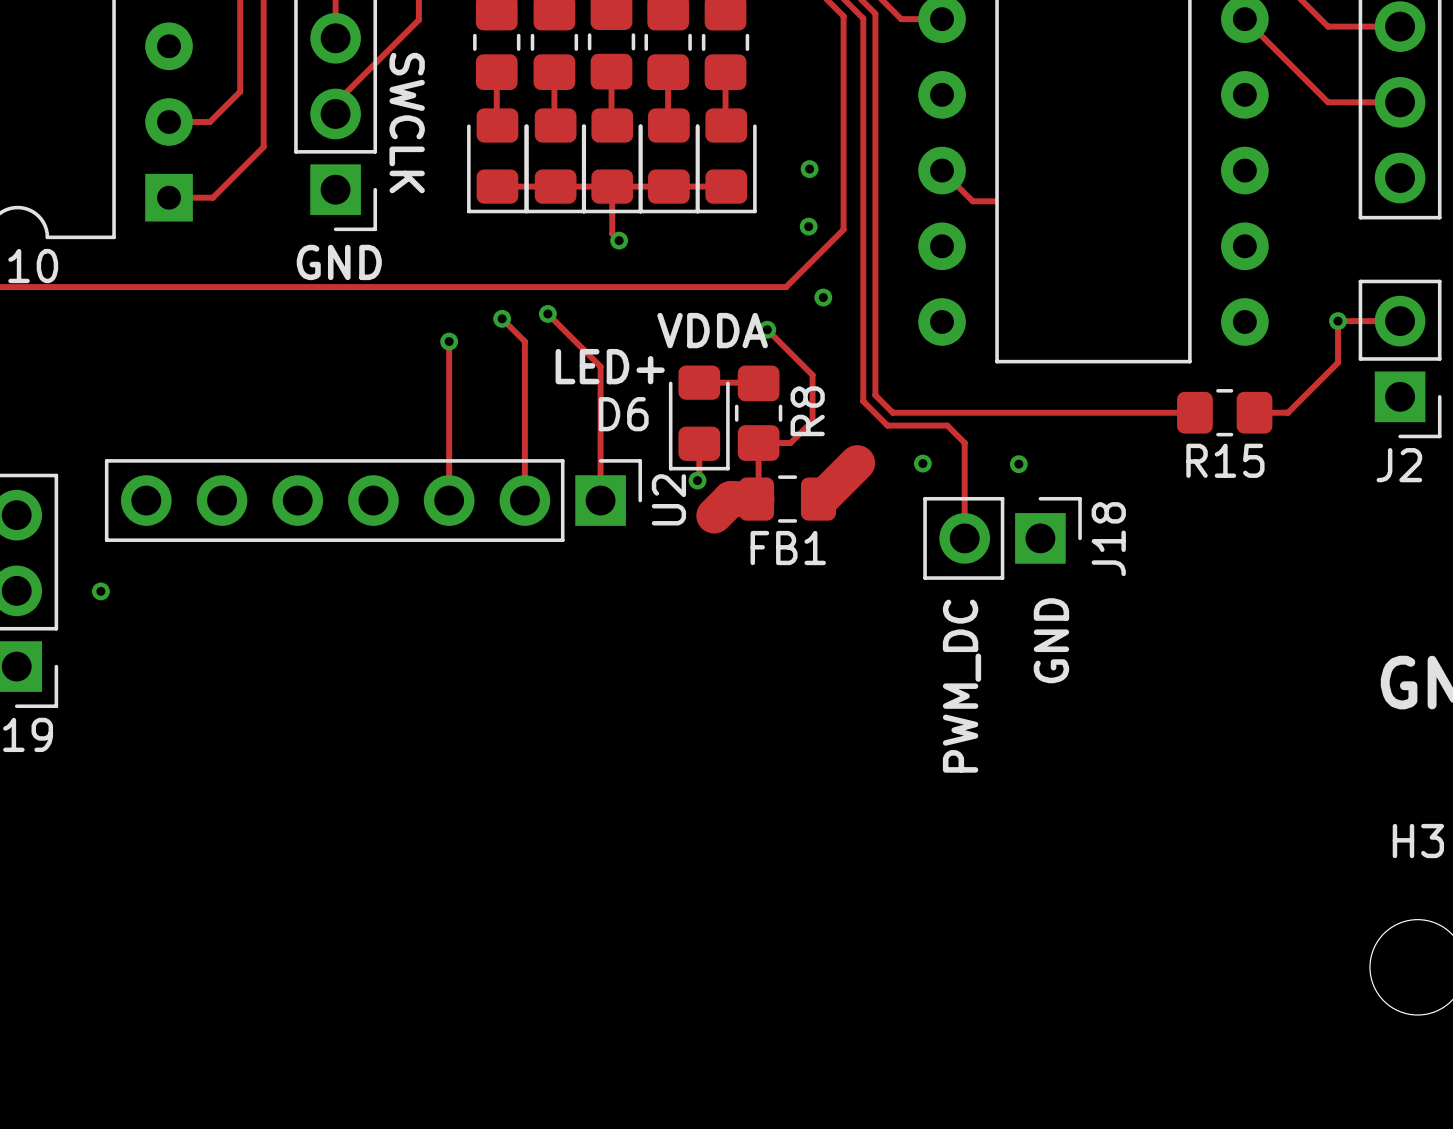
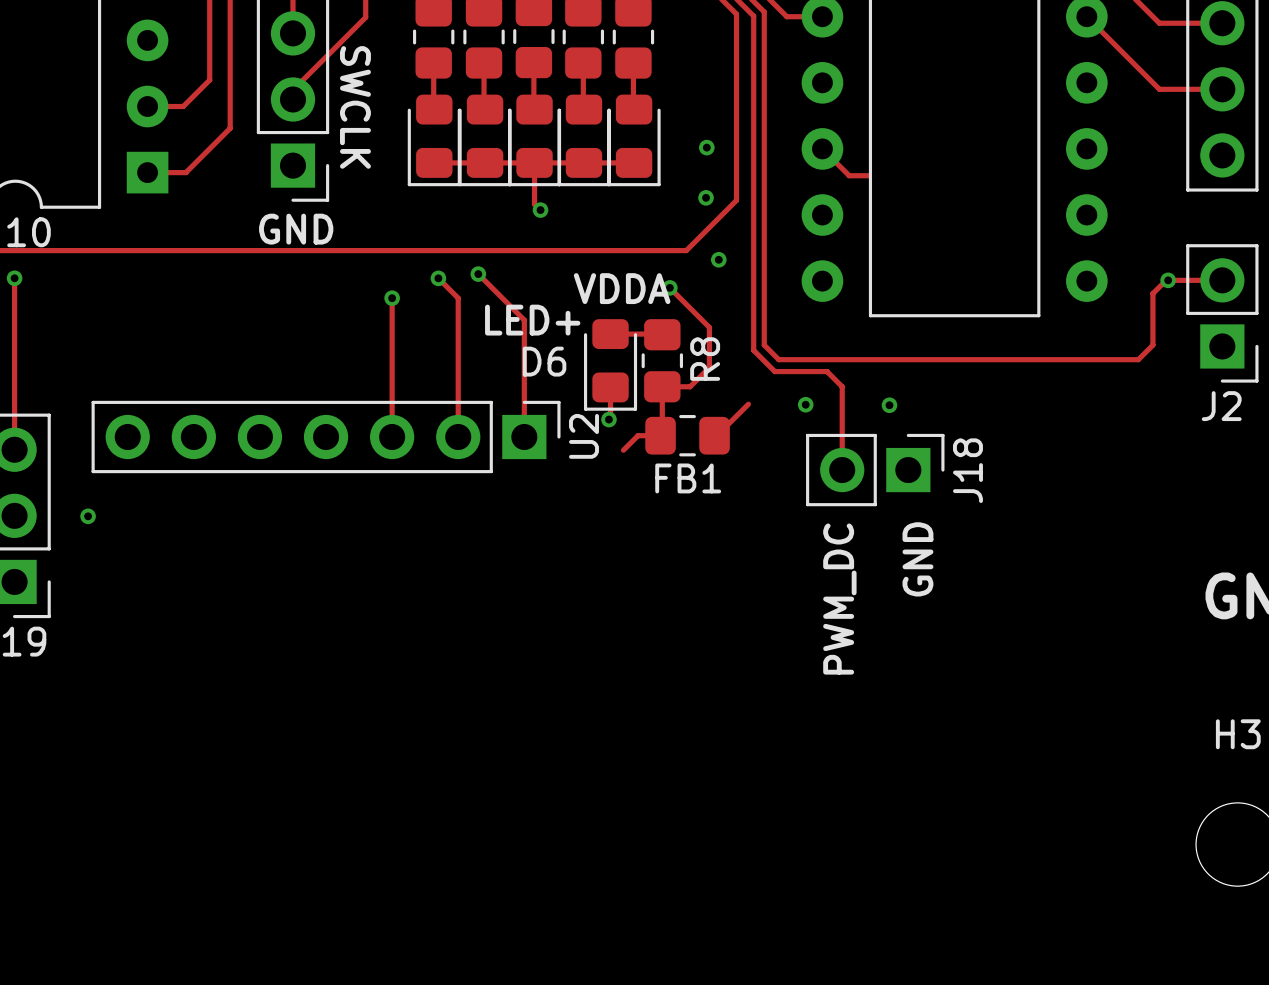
track: none -> (14, 278) (14, 449)
via: none -> (14, 278)
track: (1338, 321) (1338, 362) (1288, 412) (1254, 412) -> none
track: (892, 411) (1194, 412) -> (778, 359) (1138, 359) (1152, 345) (1152, 293) (1166, 280)
R15: (1224, 412) -> none
track width: thick (857, 462) (821, 499) -> thin (748, 404) (716, 435)
track width: thick (756, 499) (730, 499) (714, 515) -> thin (660, 435) (638, 435) (623, 450)

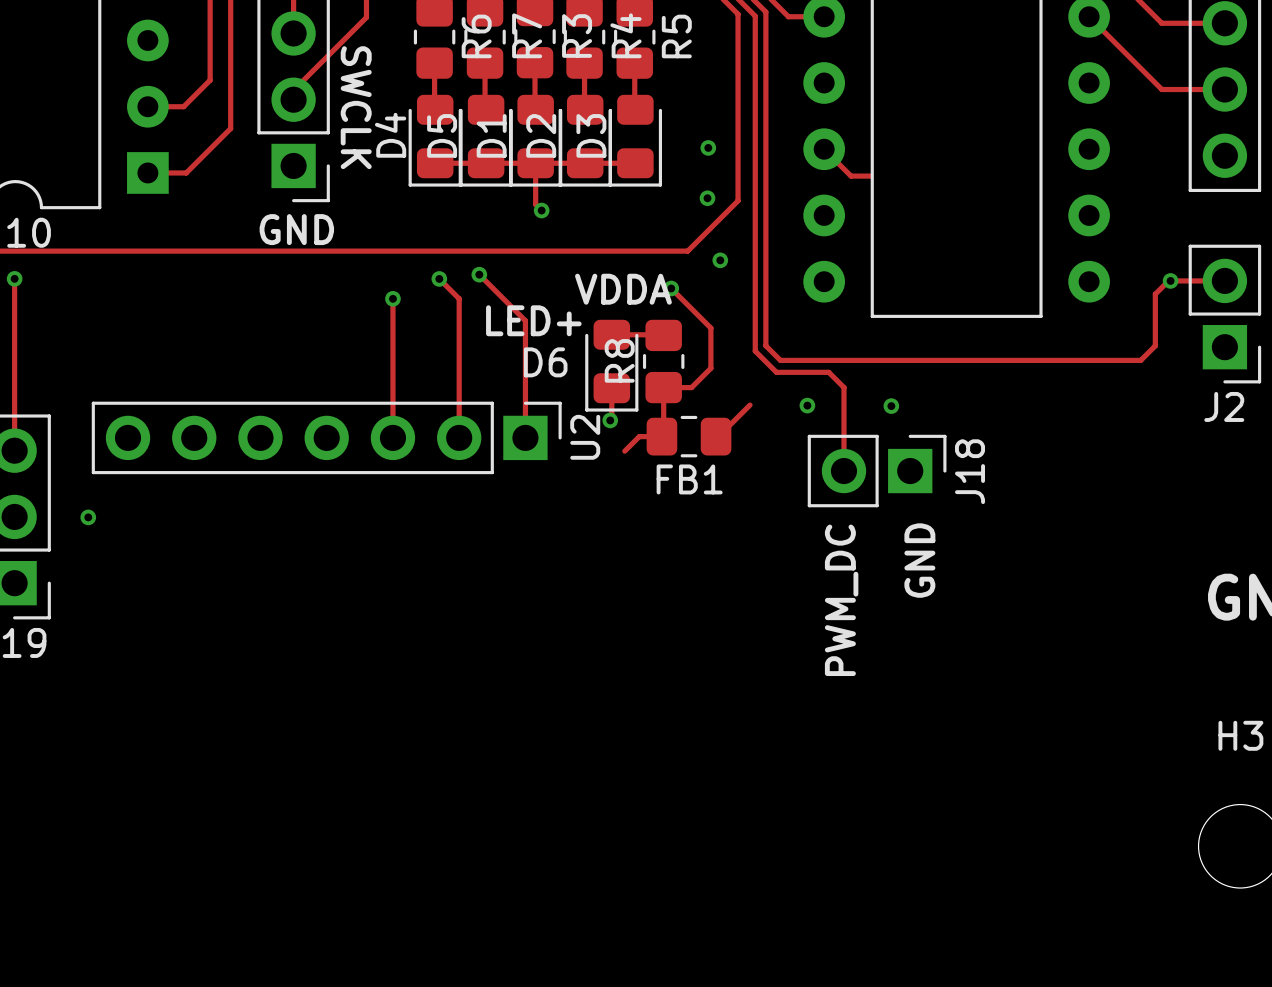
R7 name: none -> R7 (527, 35)
R3 name: none -> R3 (577, 36)
R4 name: none -> R4 (625, 35)
R6 name: none -> R6 (476, 36)
R5 name: none -> R5 (676, 36)
D4 name: none -> D4 (390, 135)
D5 name: none -> D5 (442, 135)
D1 name: none -> D1 (491, 135)
D2 name: none -> D2 (541, 135)
D3 name: none -> D3 (591, 135)
R8 name position: R8 (705, 359) -> R8 (619, 360)

